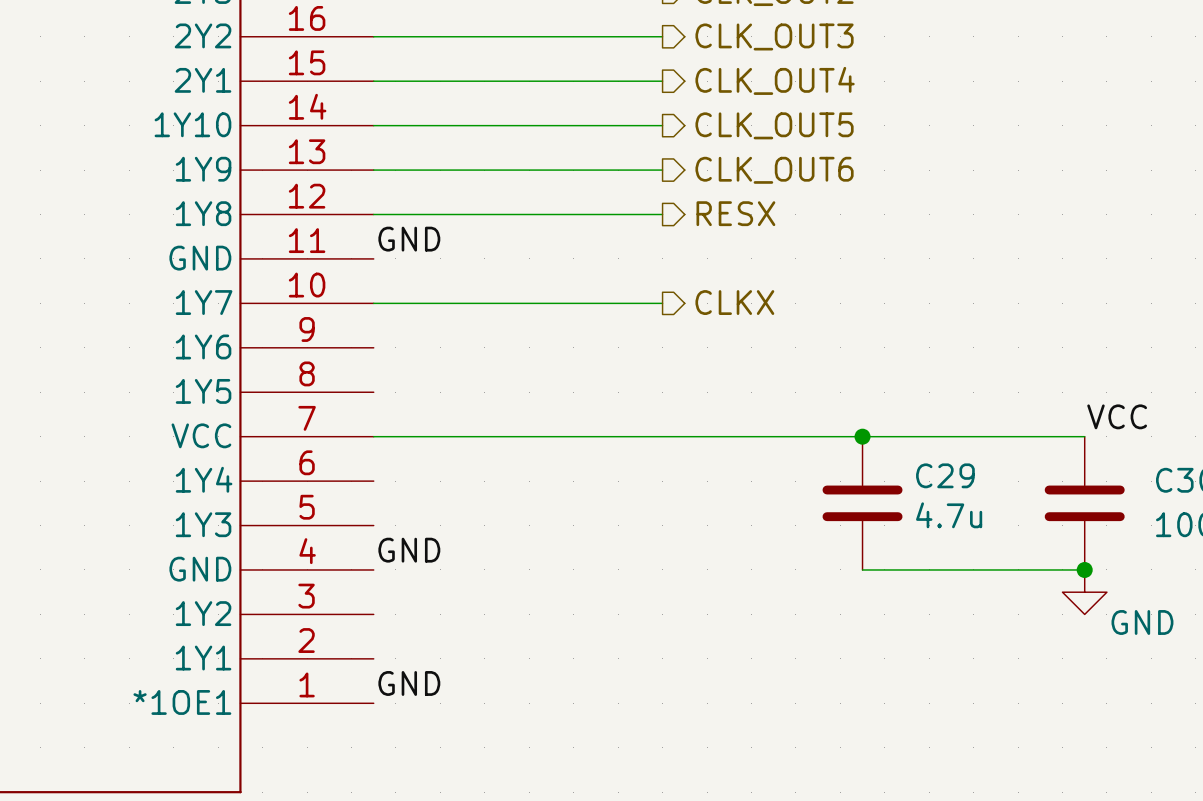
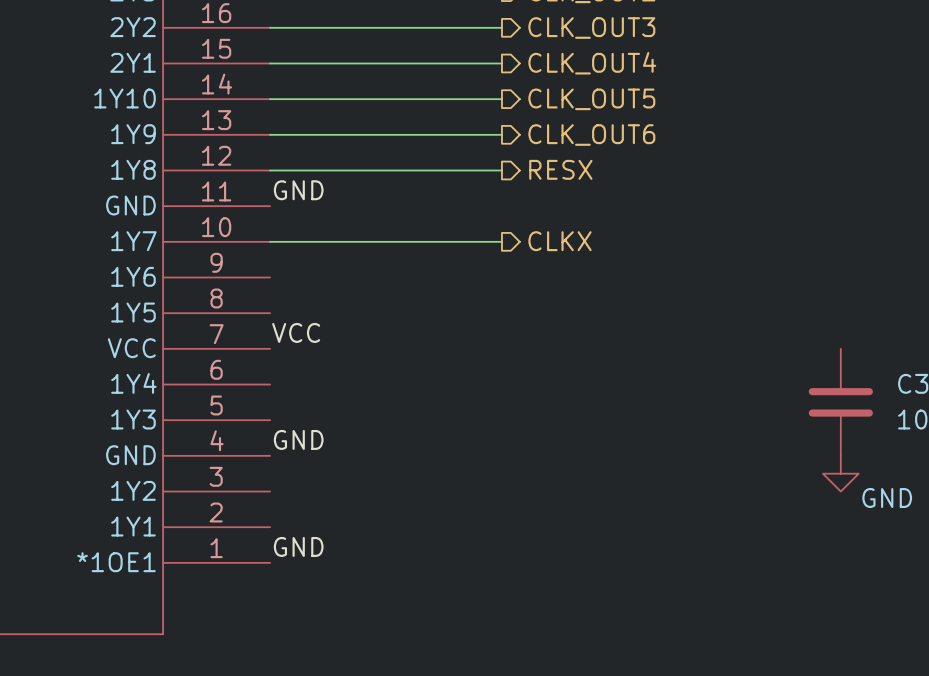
label: none -> VCC (296, 332)
label: VCC (1117, 416) -> none
wire: (373, 436) (1084, 436) -> none
junction: (862, 436) -> none
C29: 4.7u (862, 503) -> none
wire: (862, 569) (1084, 569) -> none
junction: (1084, 569) -> none

